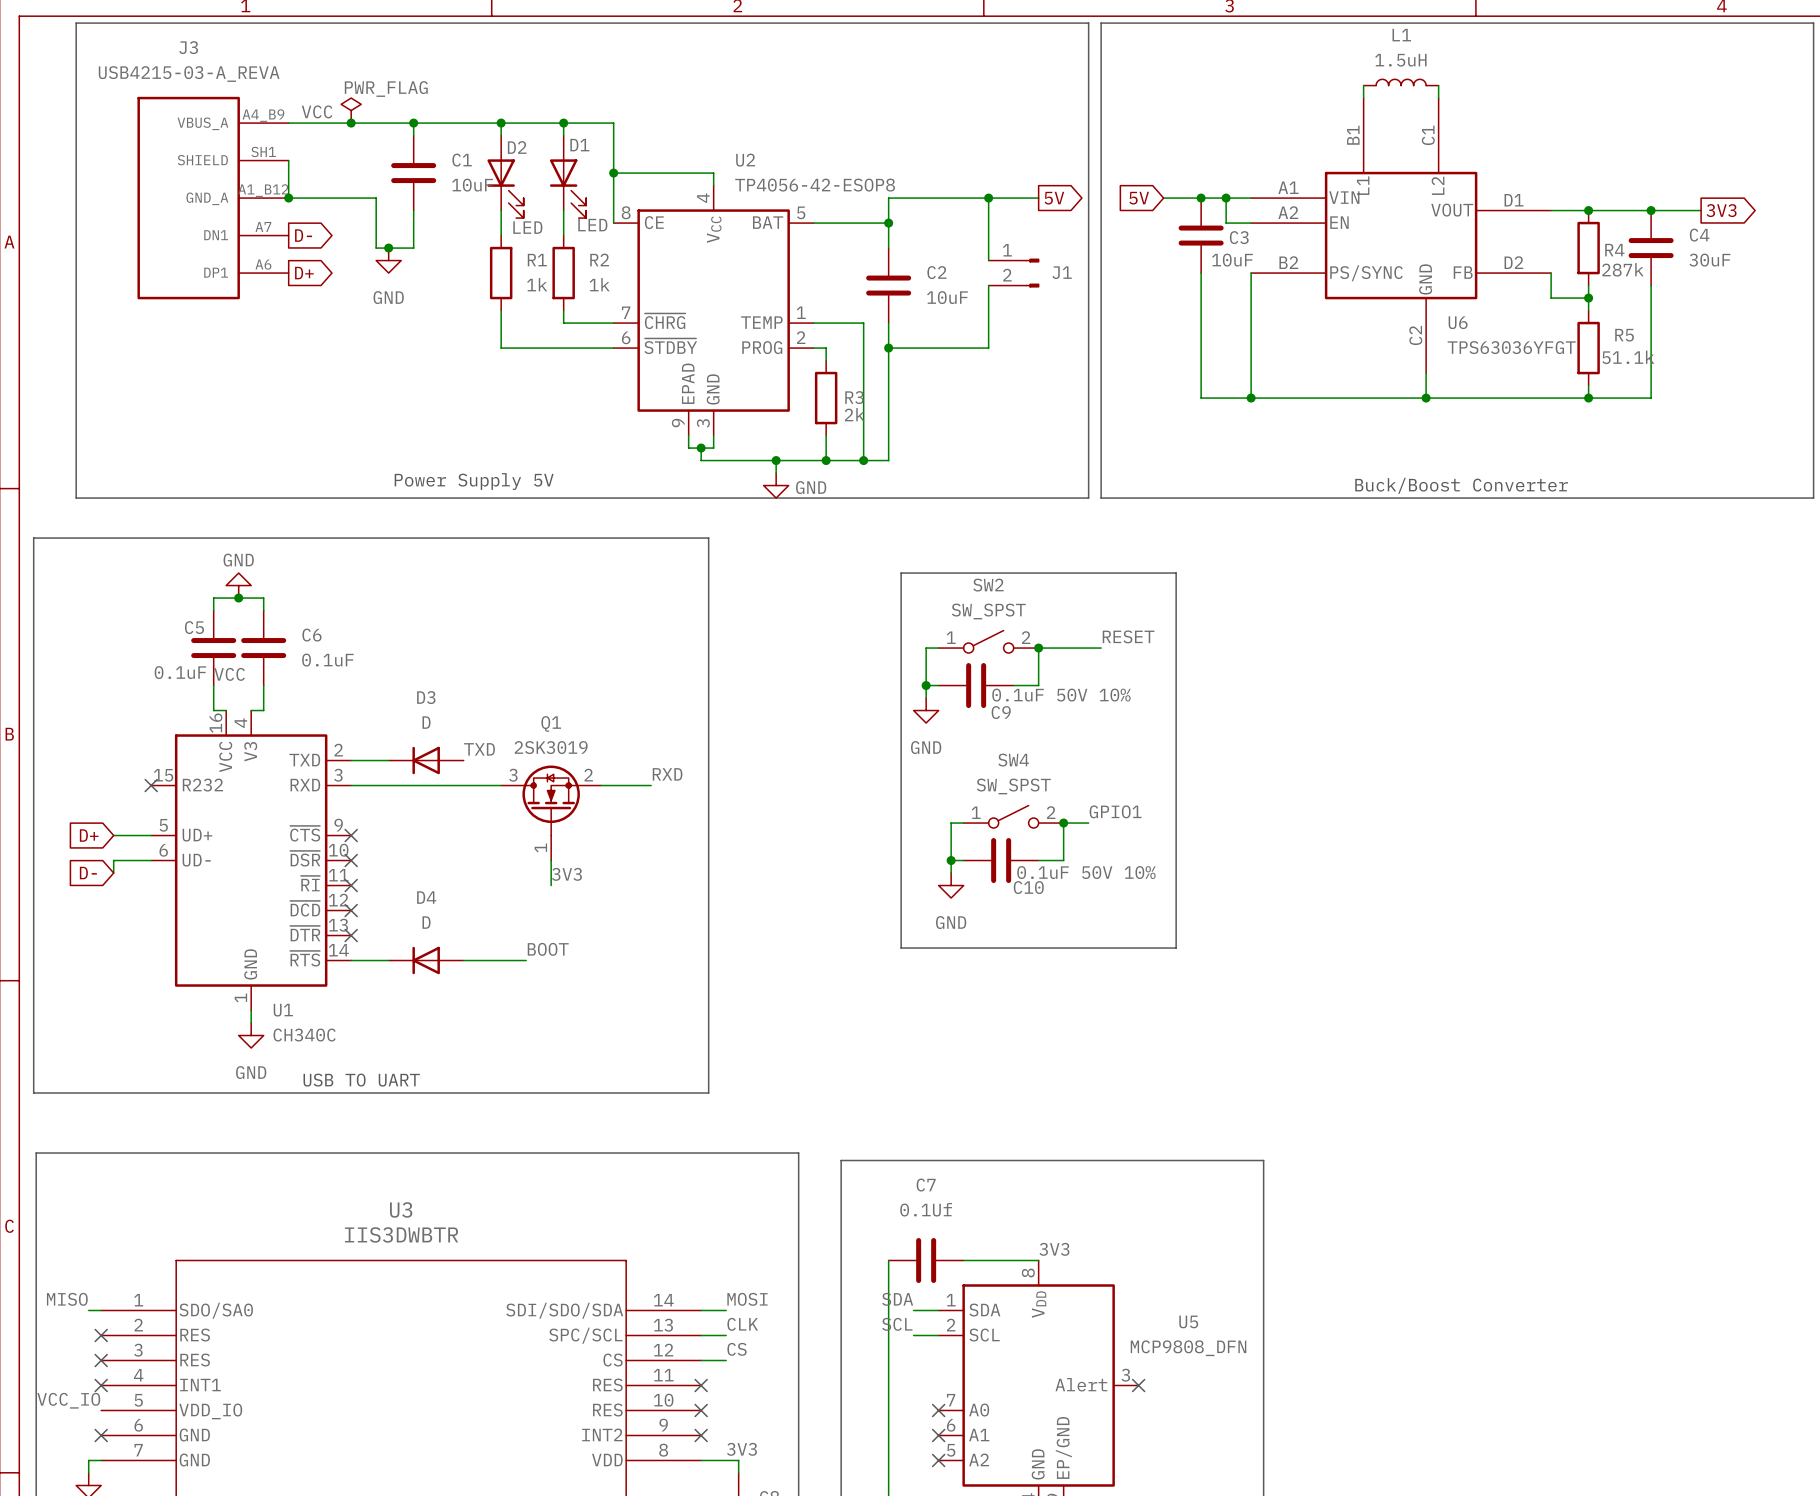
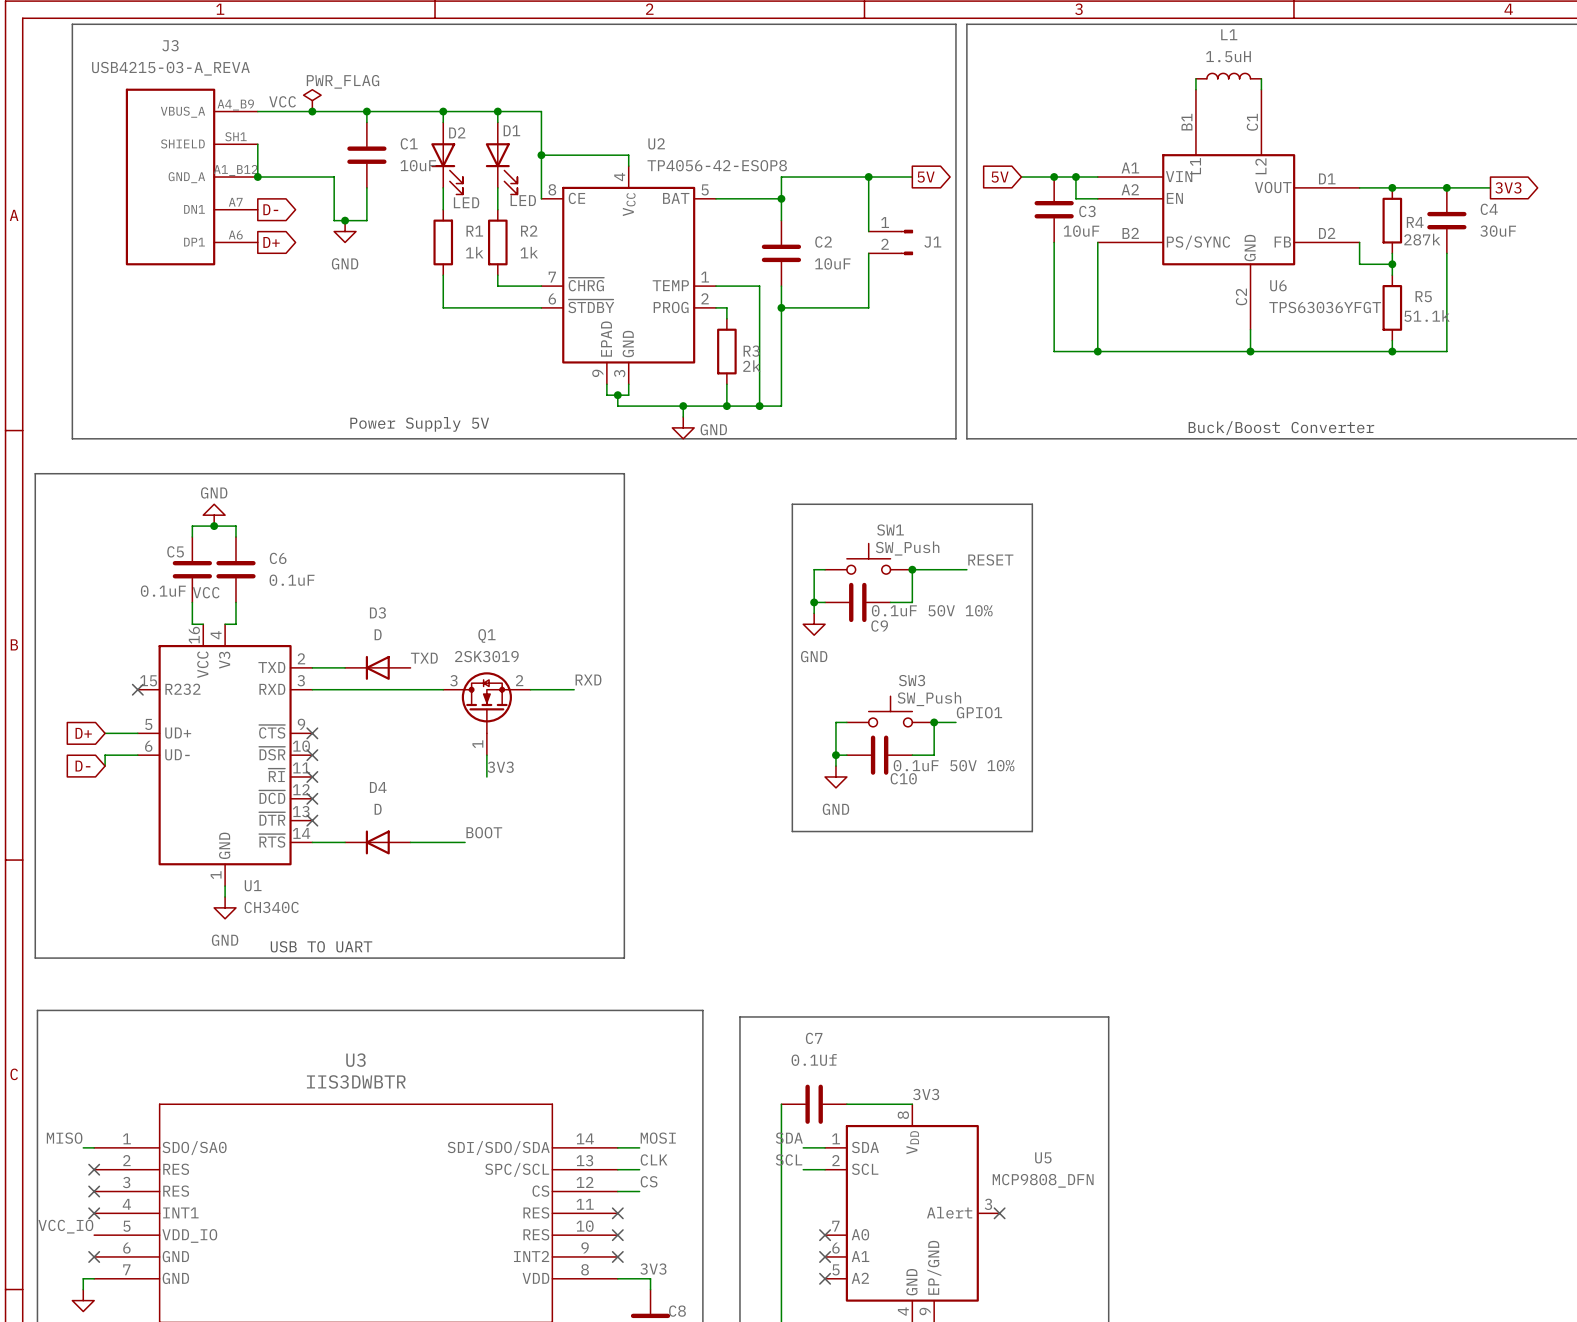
SW1: none -> SW_Push (868, 558)
SW2: SW_SPST (988, 641) -> none
SW3: none -> SW_Push (890, 711)
SW4: SW_SPST (1013, 816) -> none

